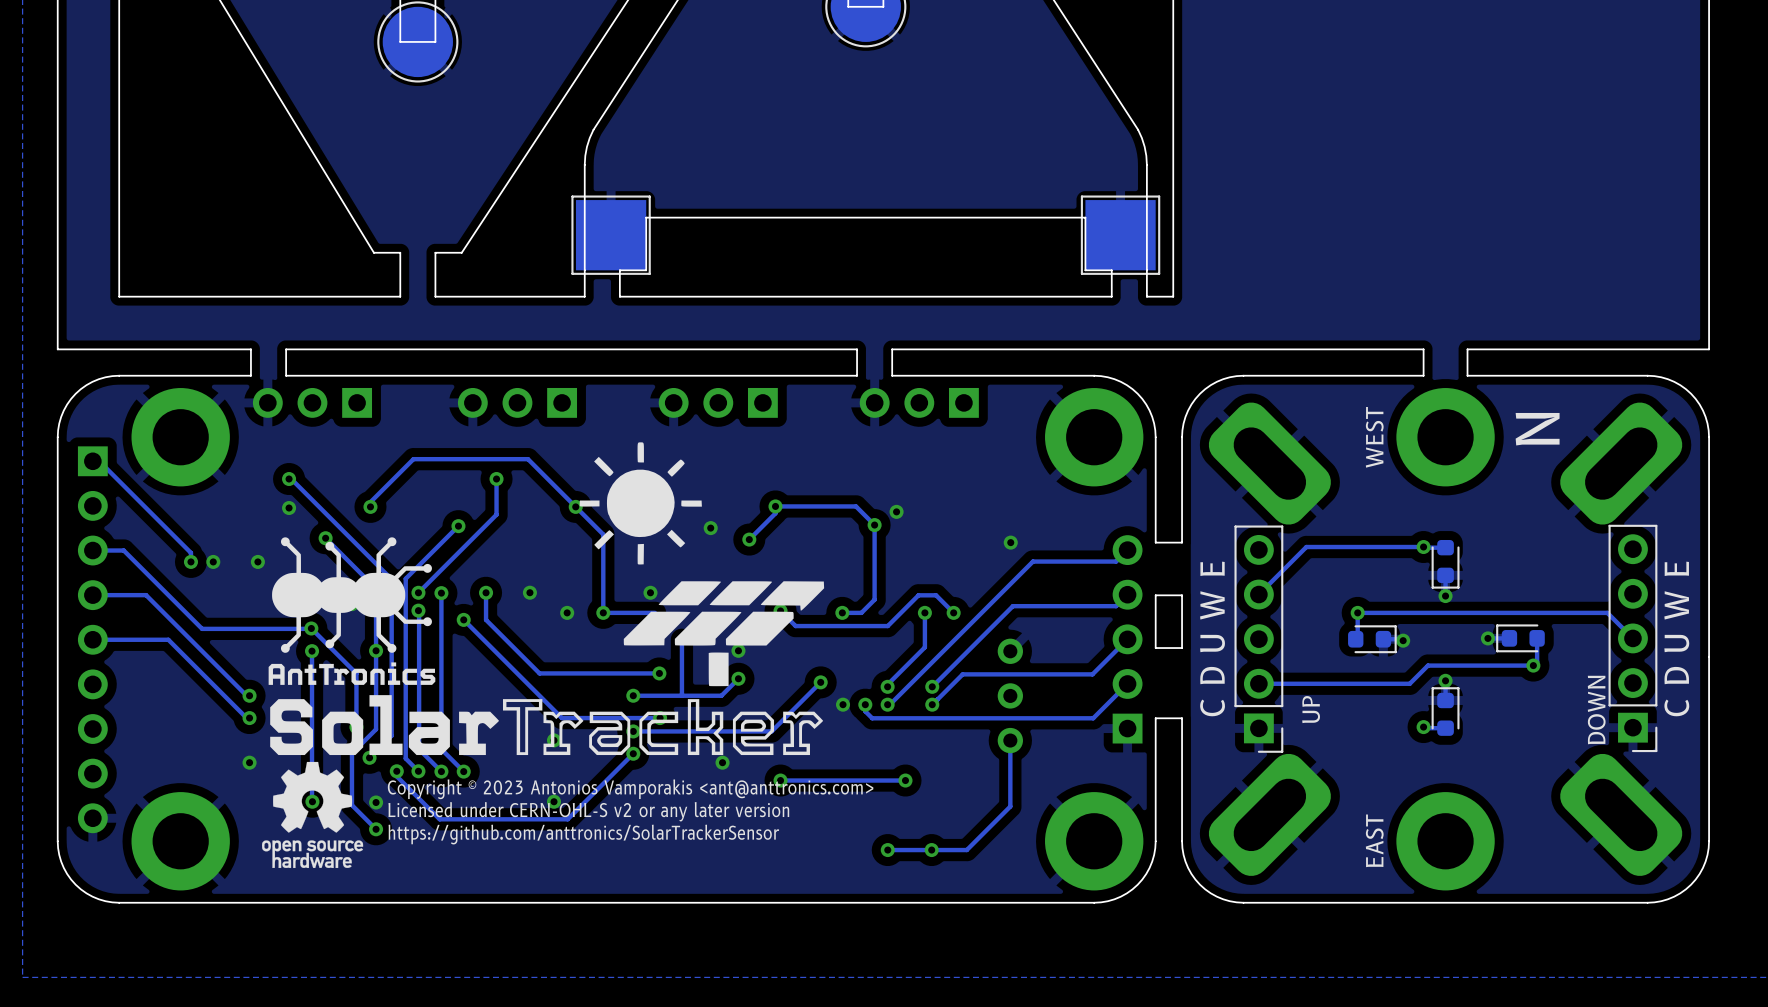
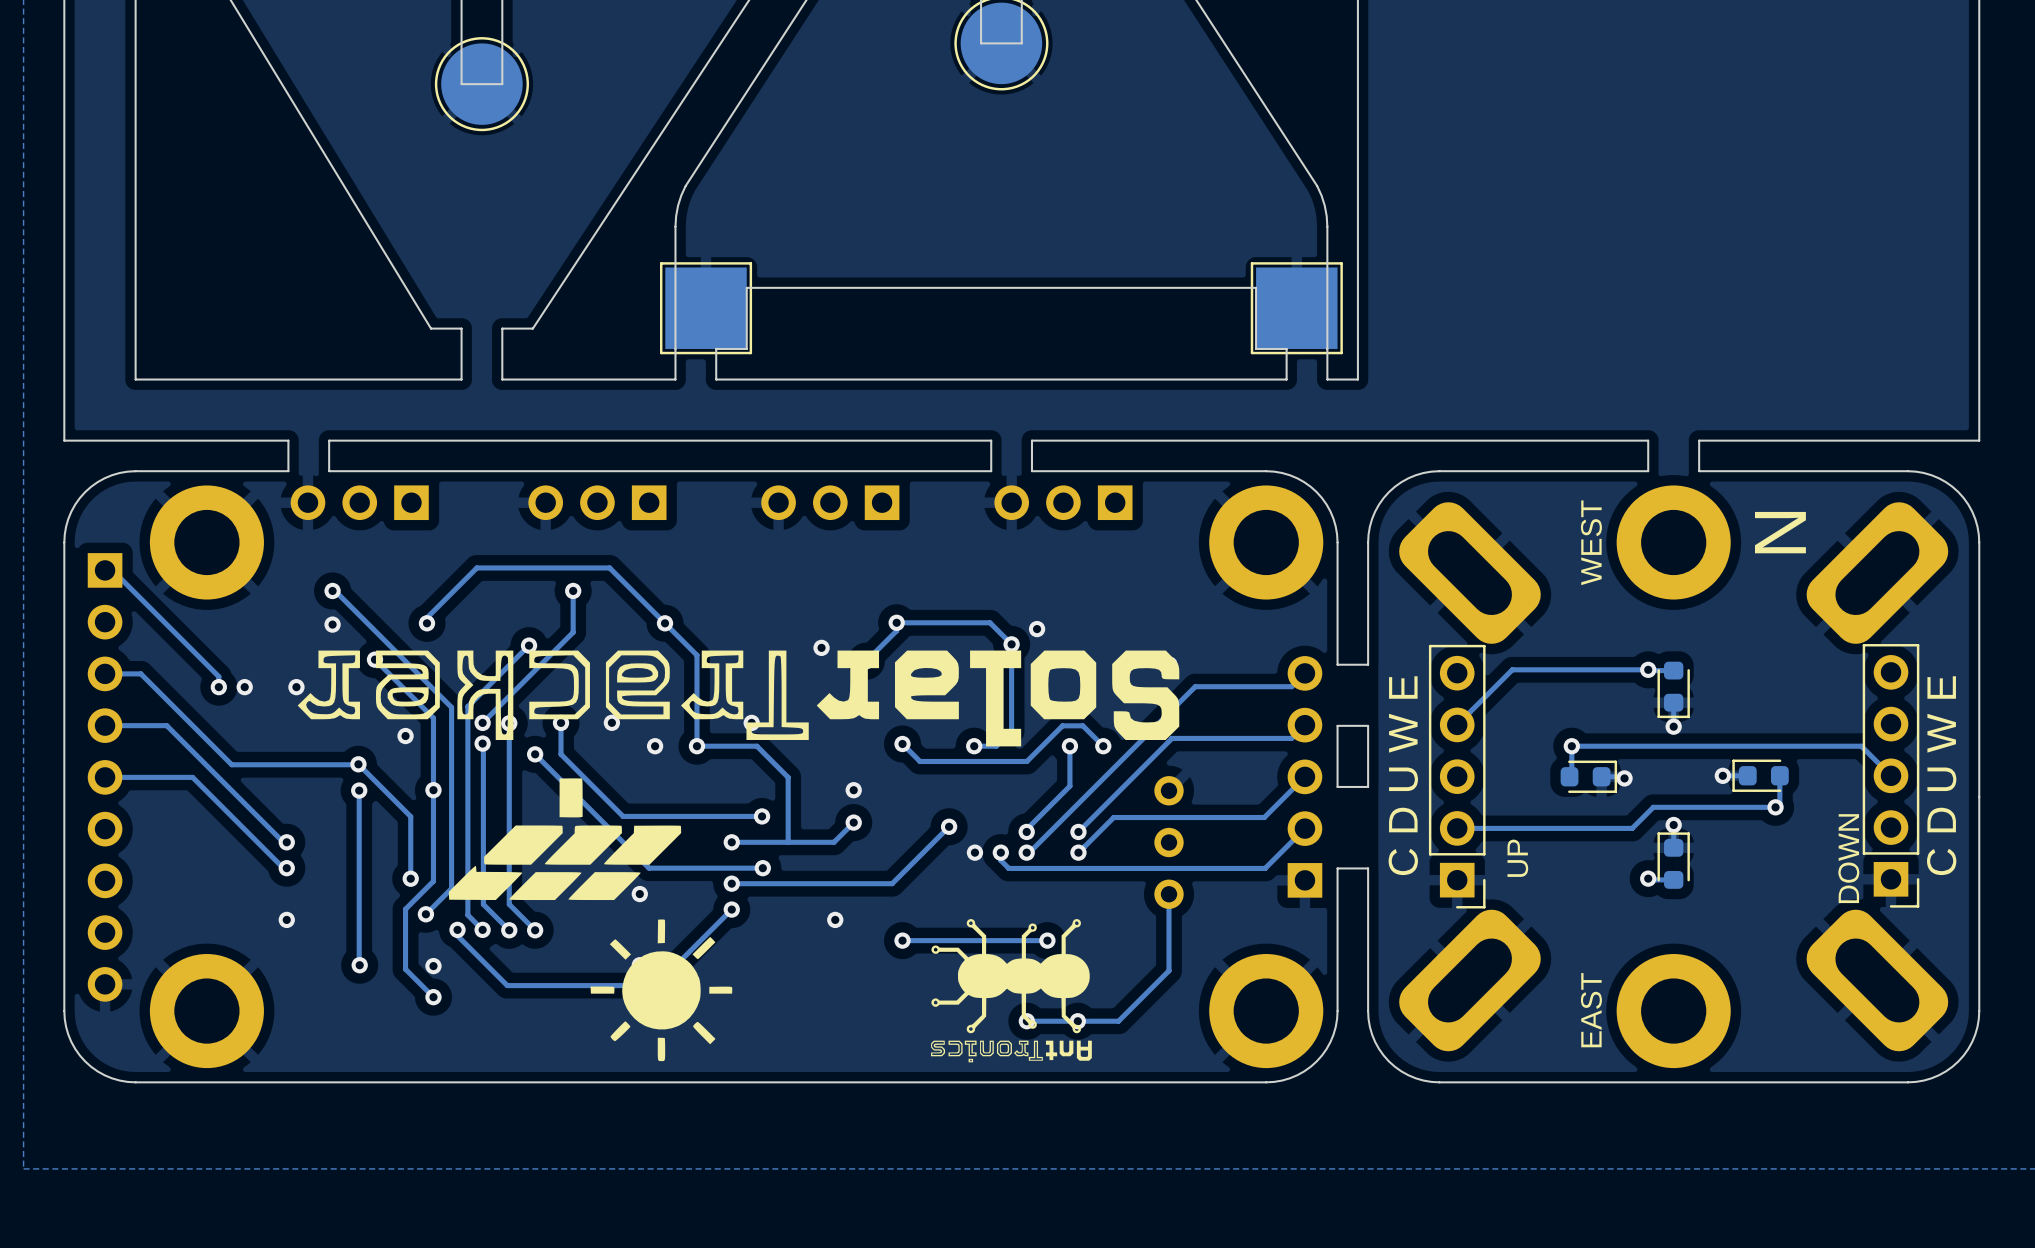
drawing: [262, 442, 825, 869] -> none
drawing: none -> [297, 650, 1180, 747]
track: none -> (756, 746) (788, 777)
drawing: none -> [448, 778, 733, 1062]
drawing: none -> [931, 919, 1092, 1063]
text: Copyright © 2023 Antonios Vamporakis <ant@anttronics.com> (630, 789) -> none
text: Licensed under CERN-OHL-S v2 or any later version (588, 811) -> none
text: https://github.com/anttronics/SolarTrackerSensor (583, 834) -> none

